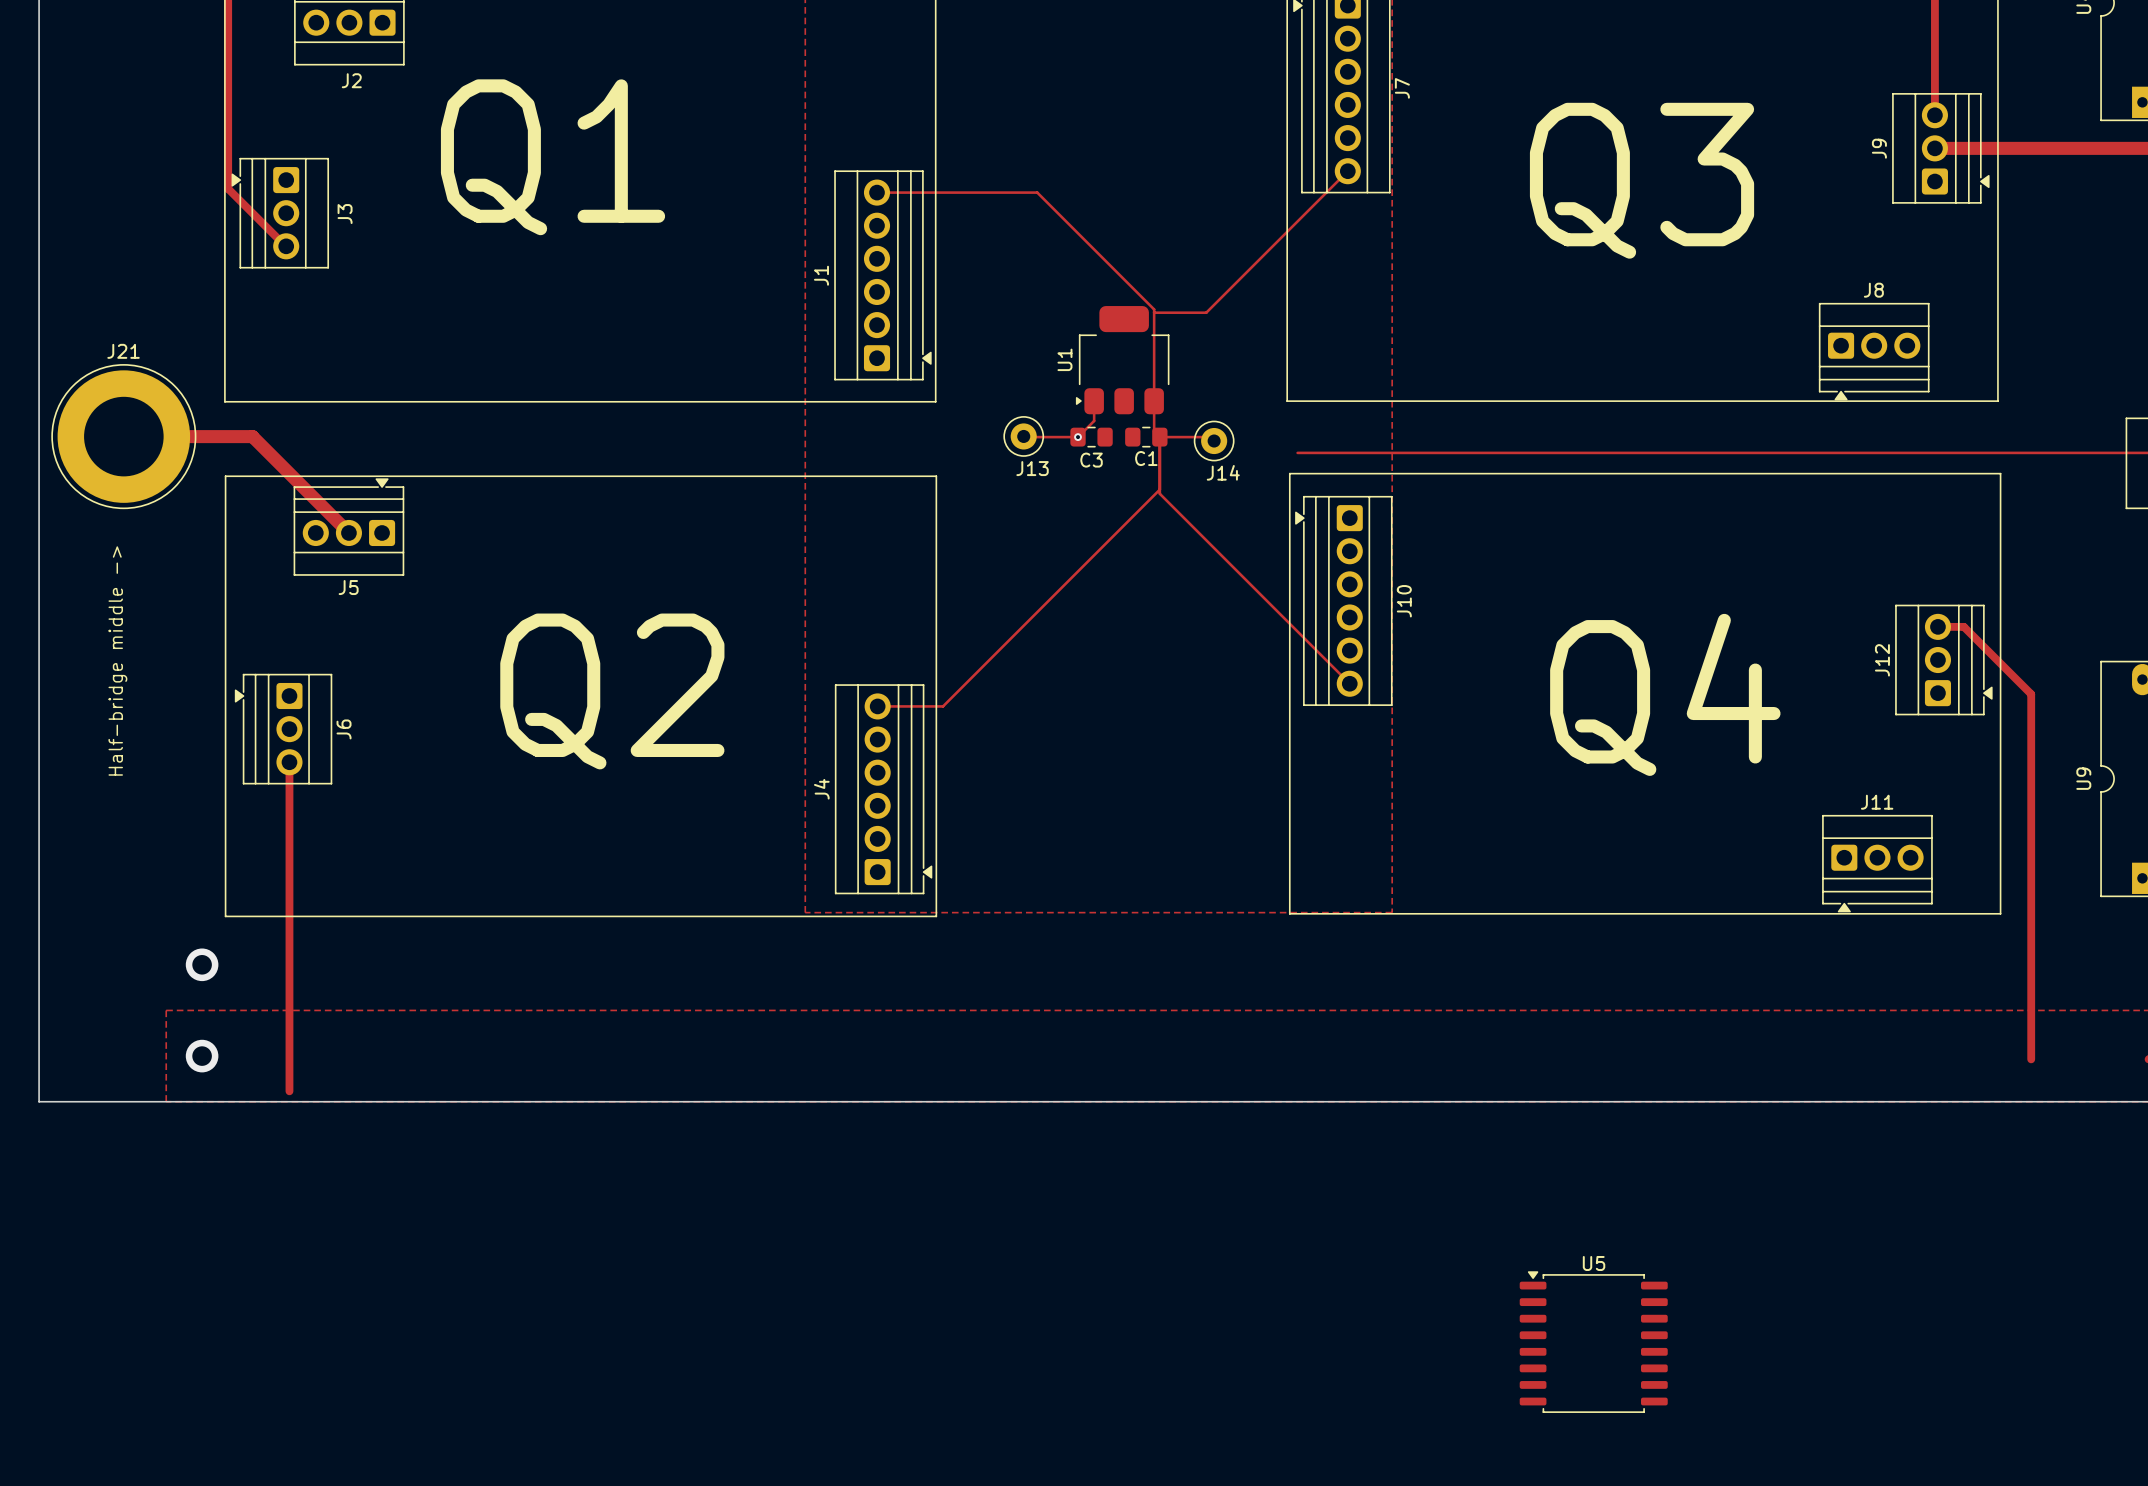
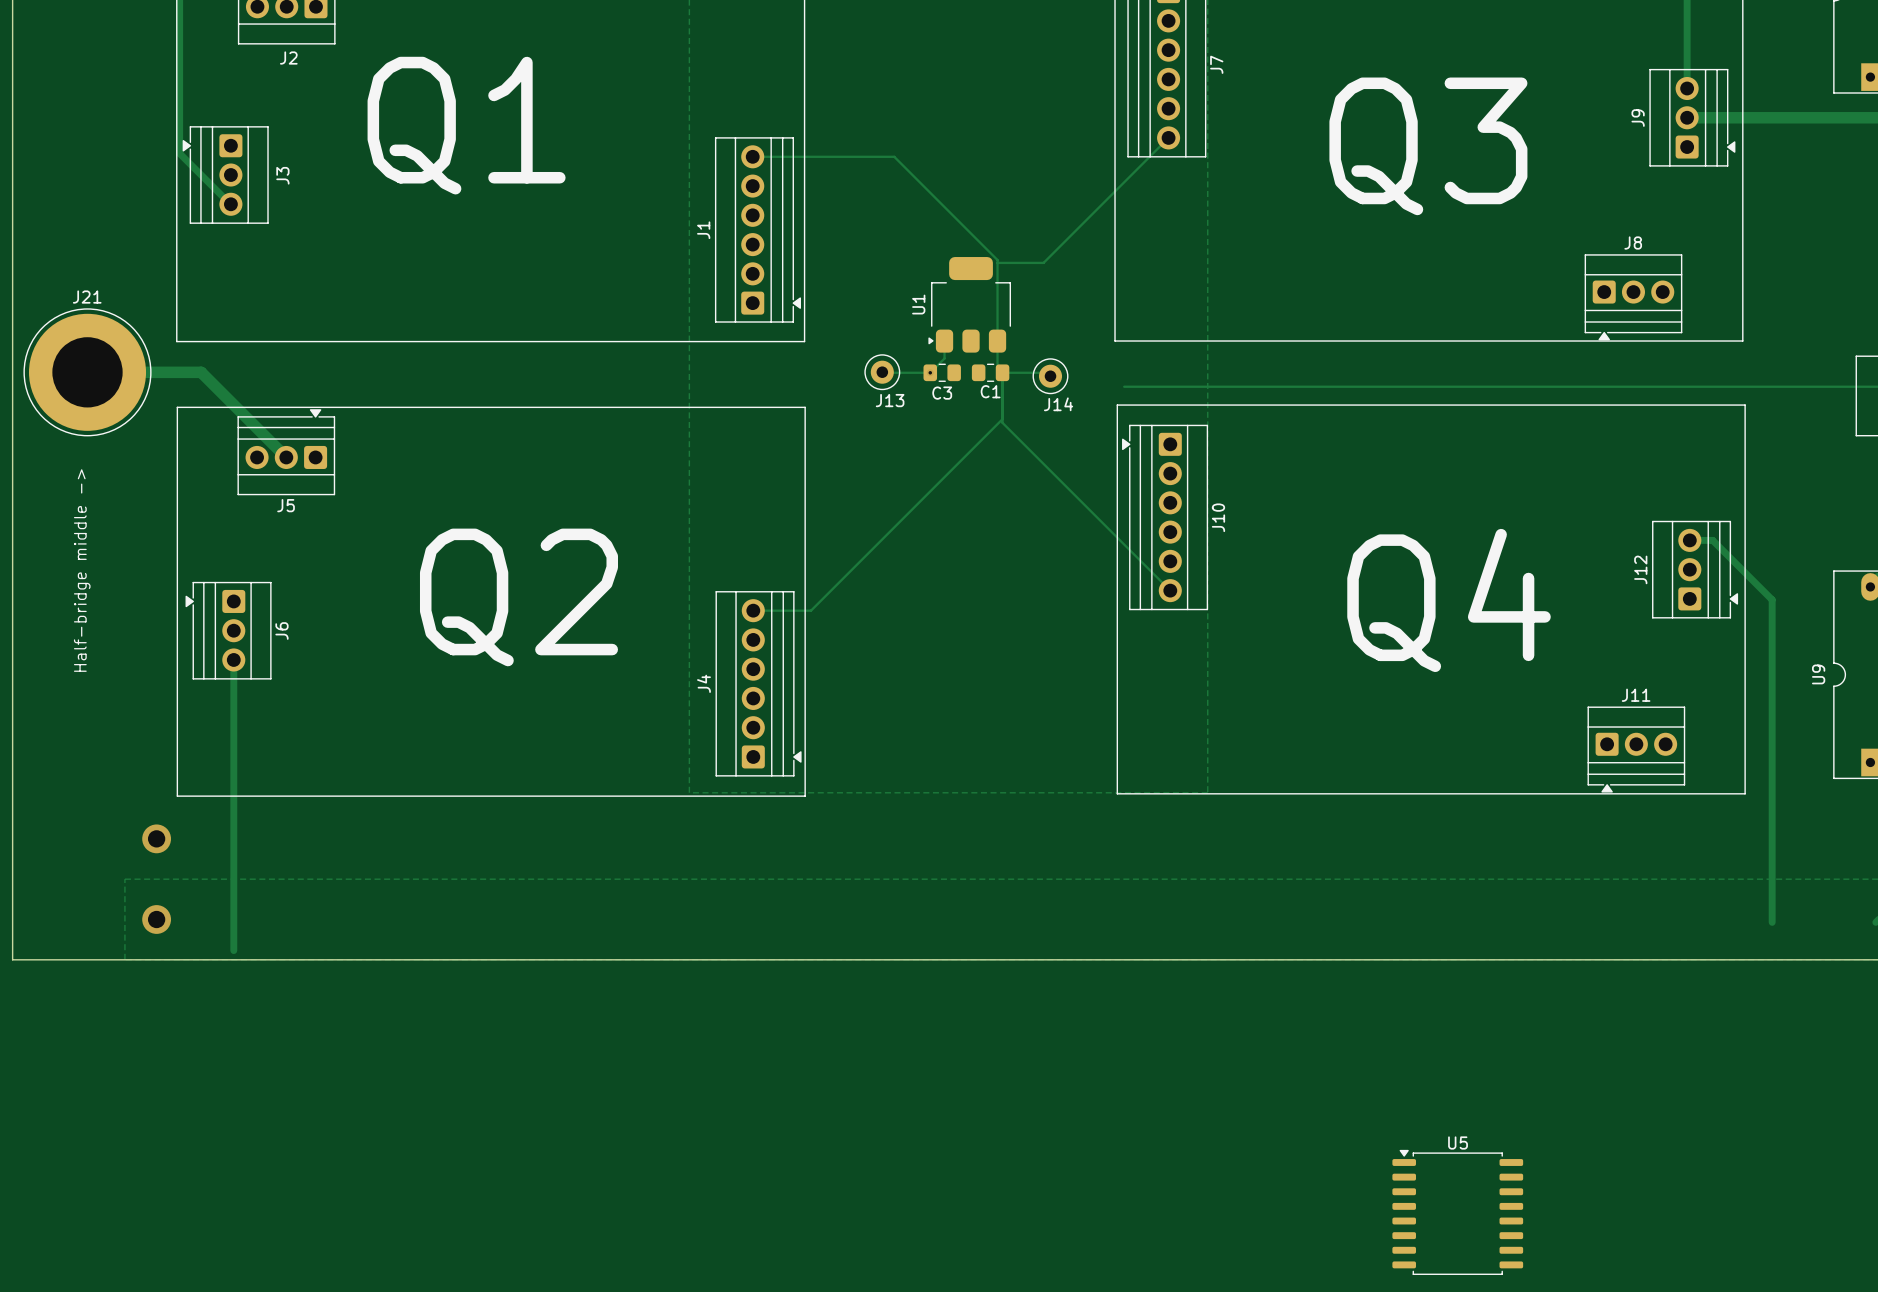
U5 position: (1593, 1342) -> (1457, 1212)

